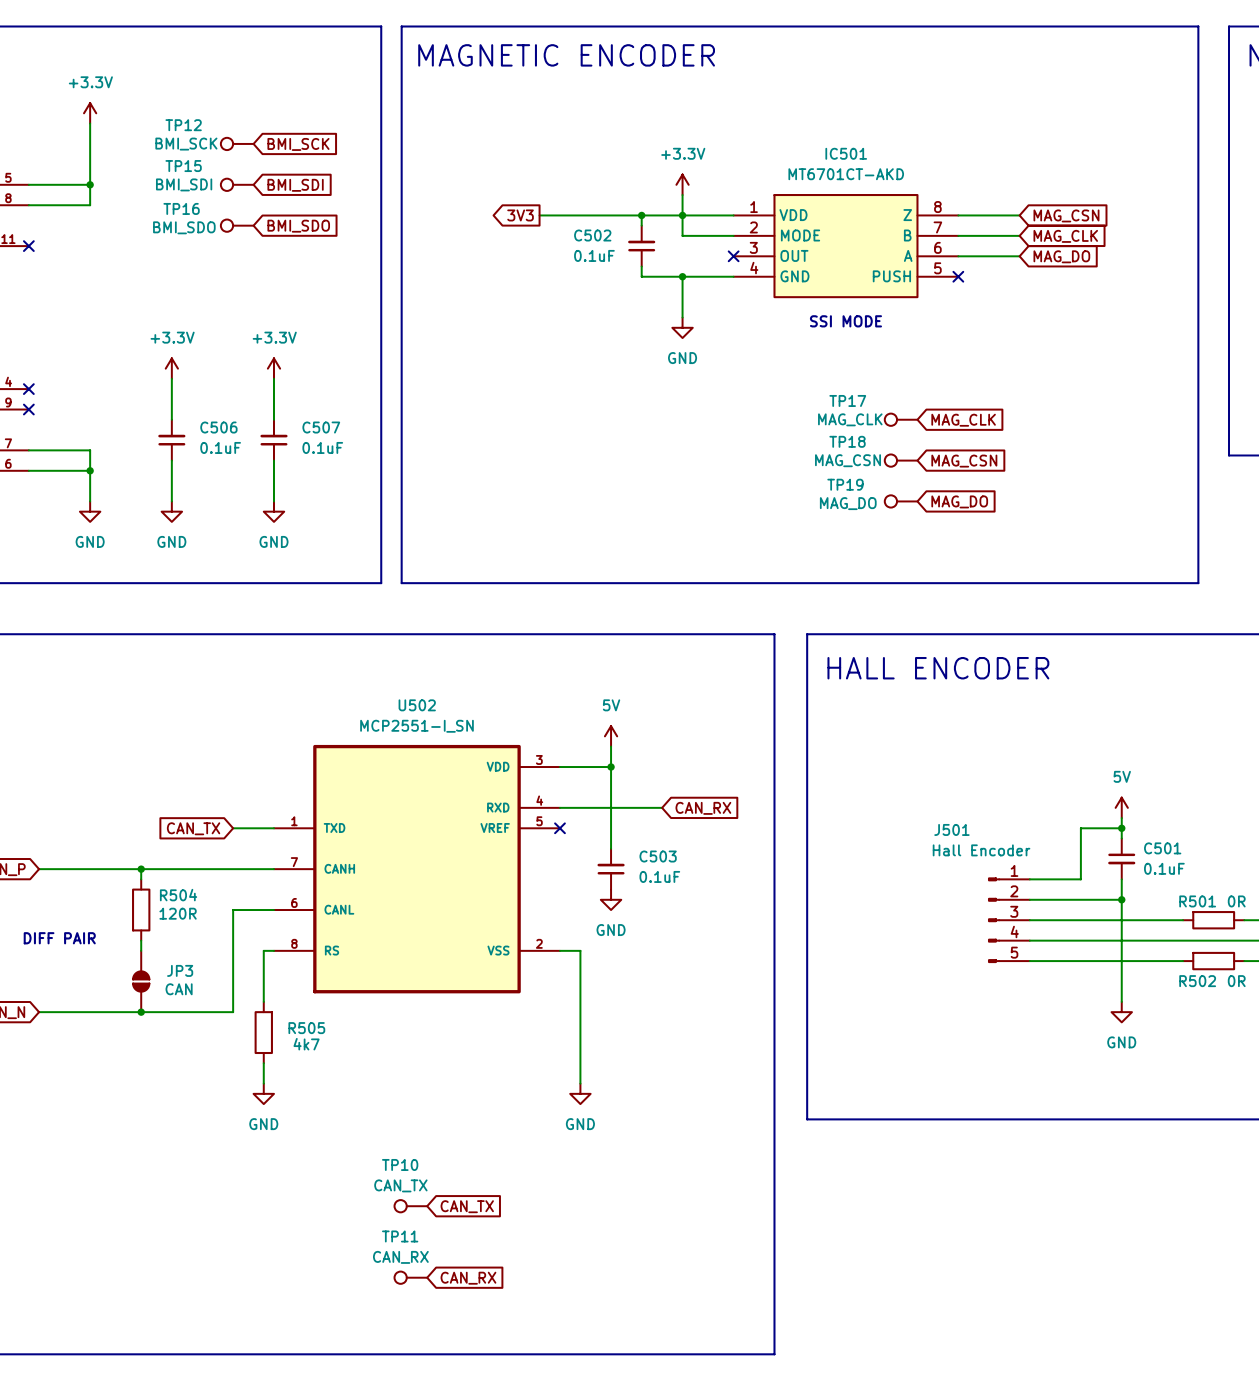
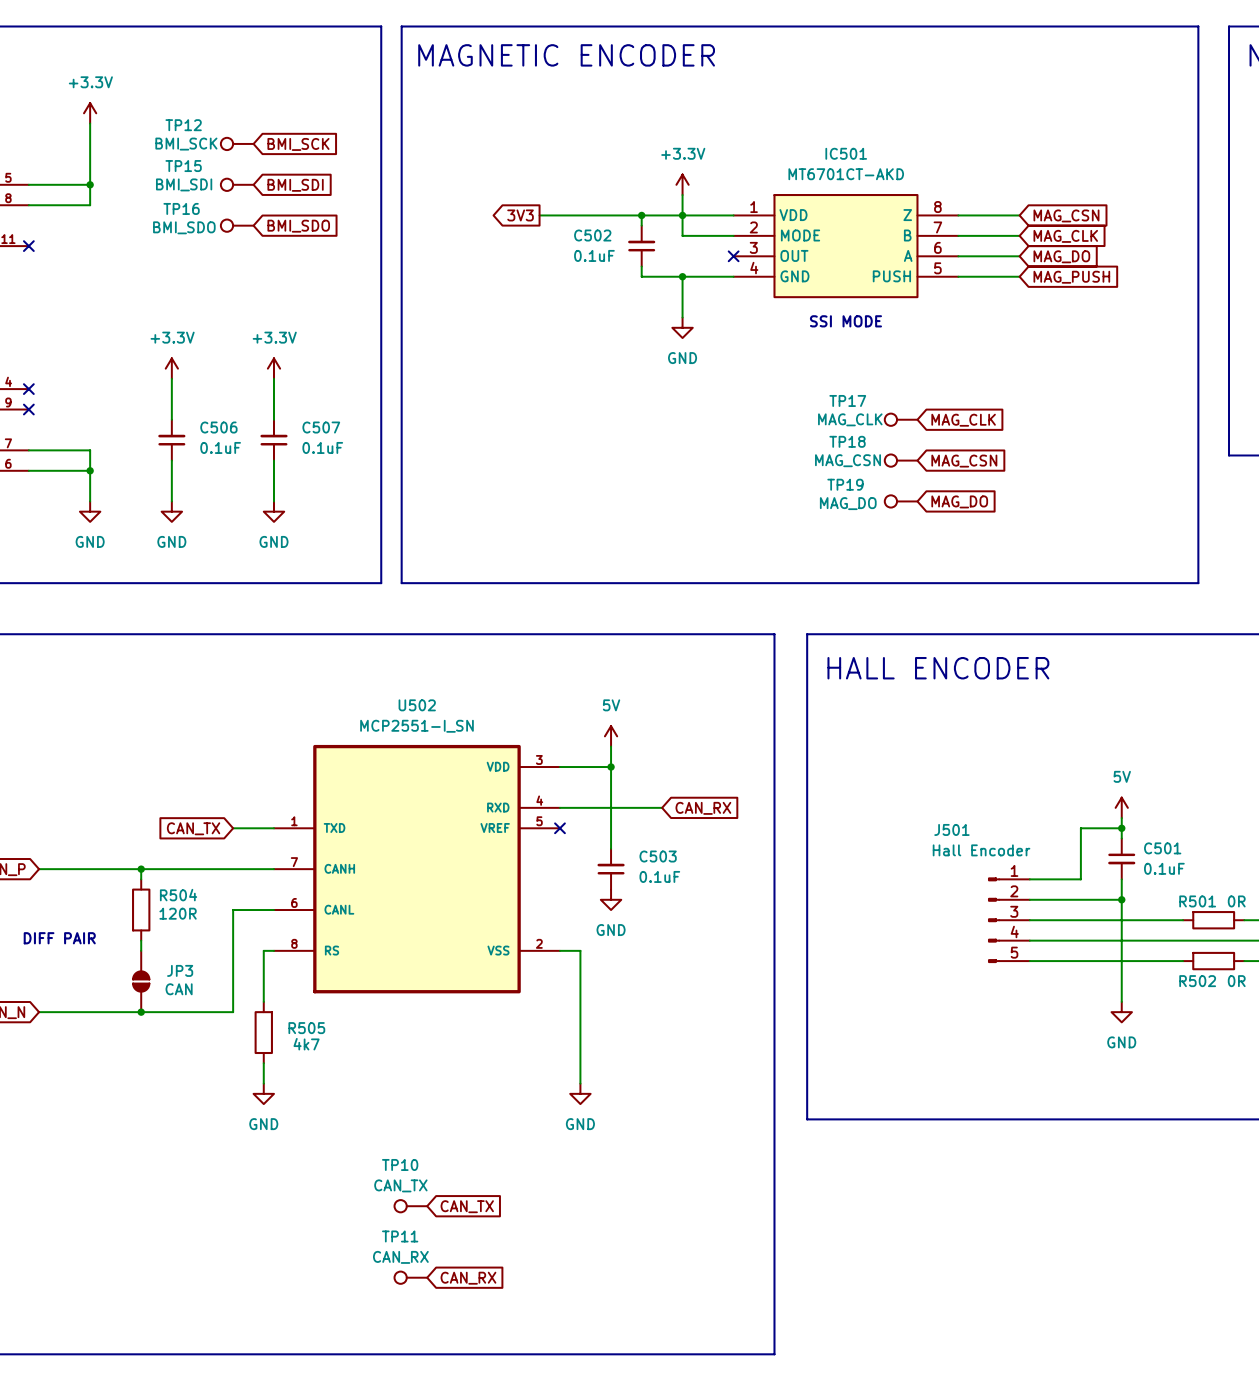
wire: none -> (958, 276) (1019, 276)
no-connect mark: (958, 276) -> none
global label: none -> MAG_PUSH (1071, 277)

